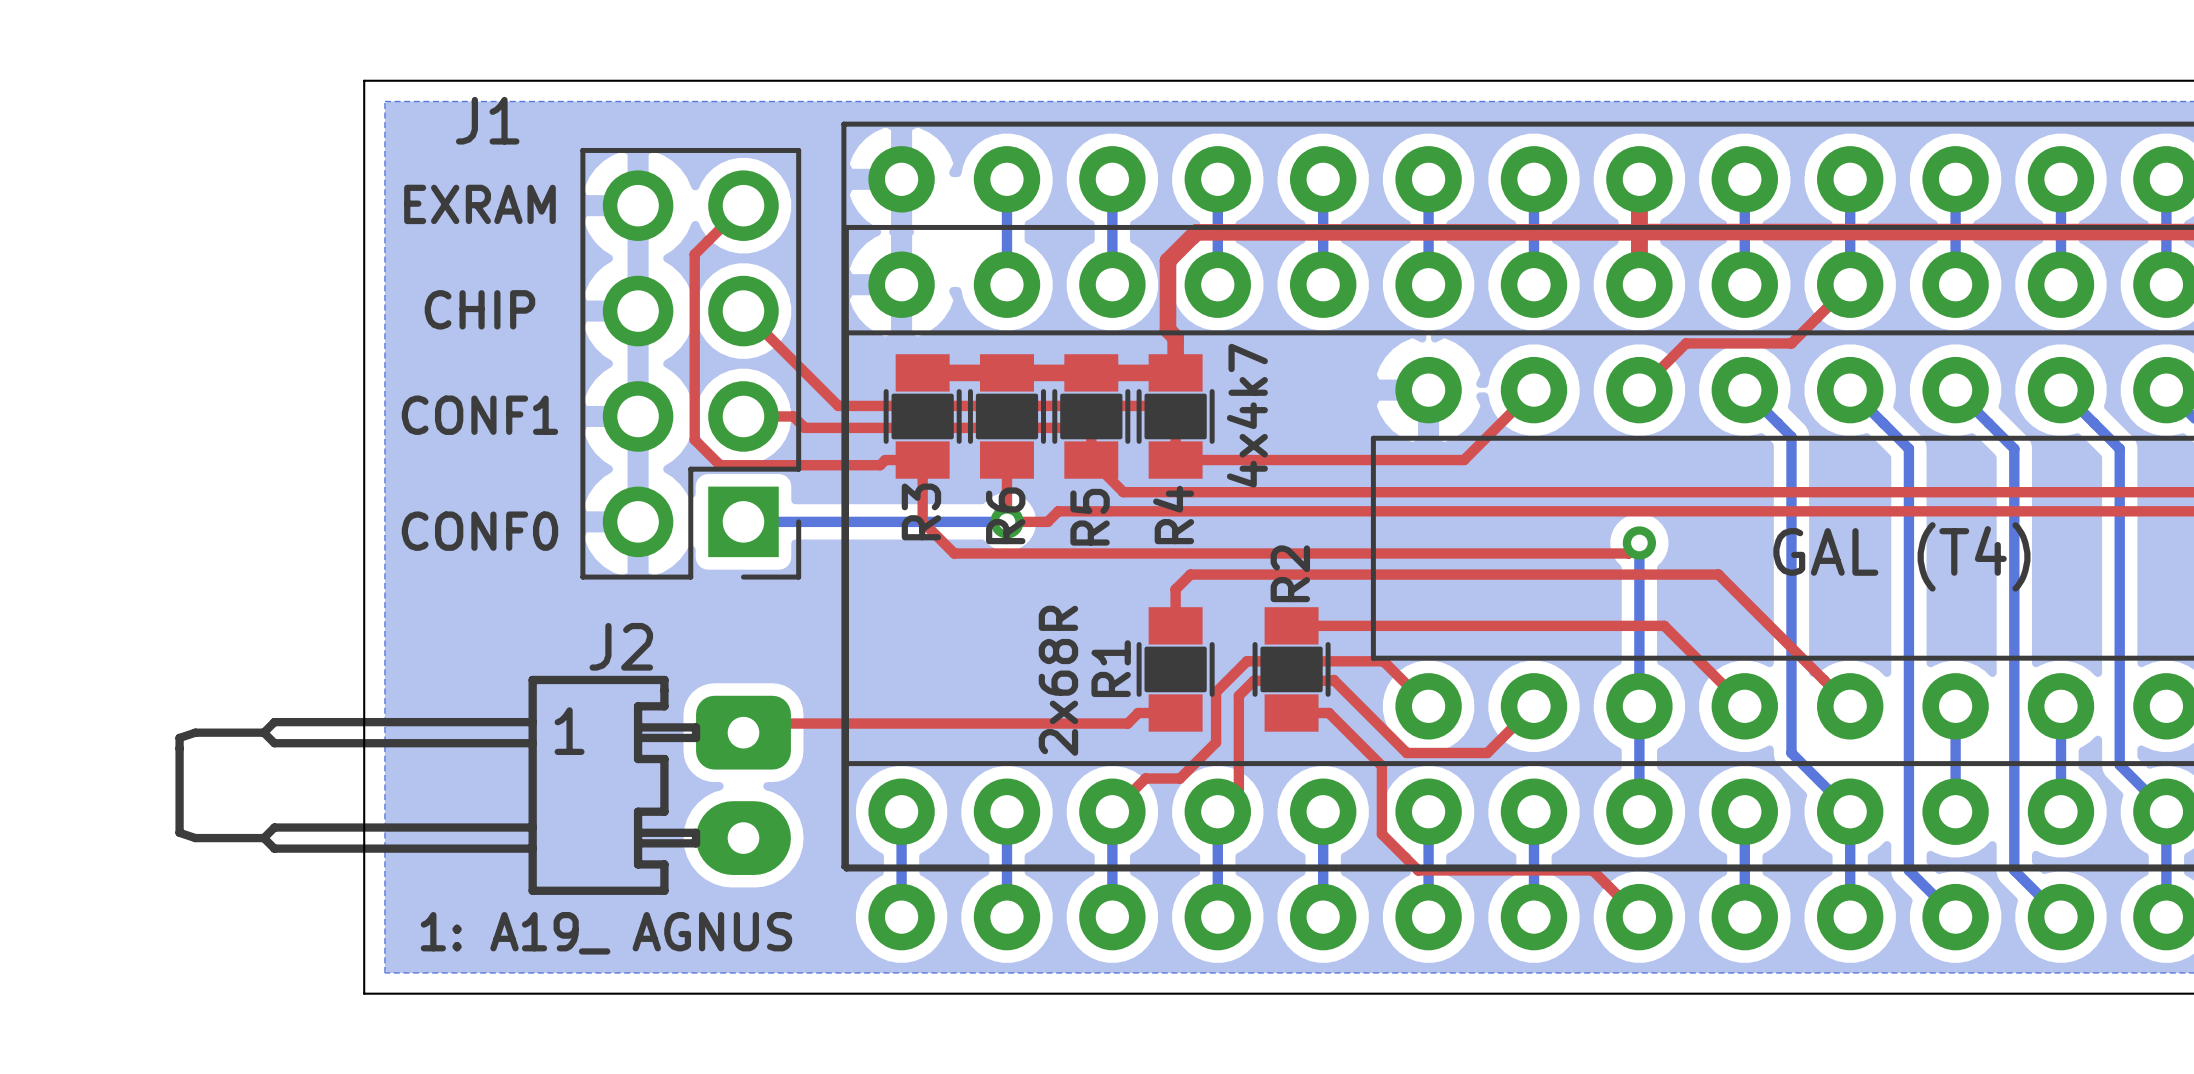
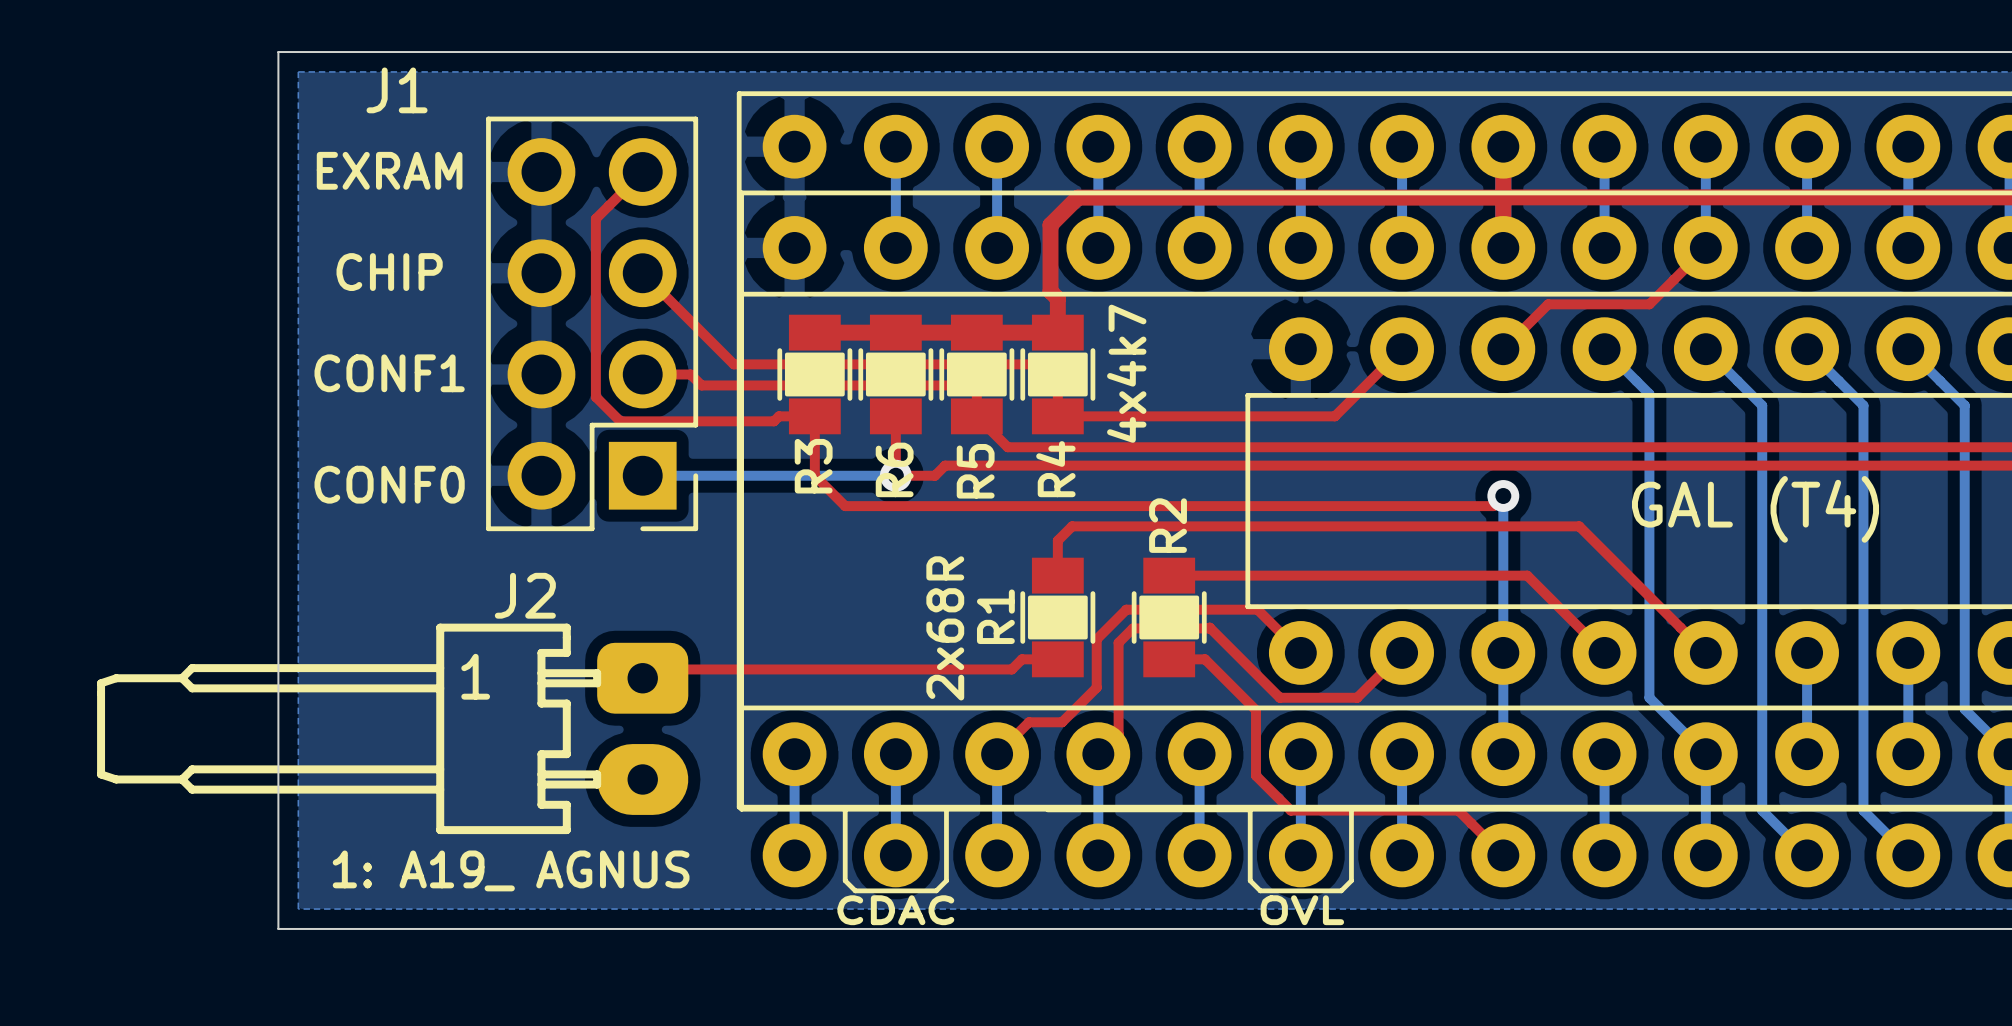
line: none -> (845, 809) (845, 880) (855, 890) (936, 890) (946, 880) (946, 809)
line: none -> (1047, 809) (1250, 809) (1250, 880) (1260, 890) (1341, 890) (1351, 880) (1351, 809)
text: none -> CDAC (895, 910)
text: none -> OVL (1302, 910)

